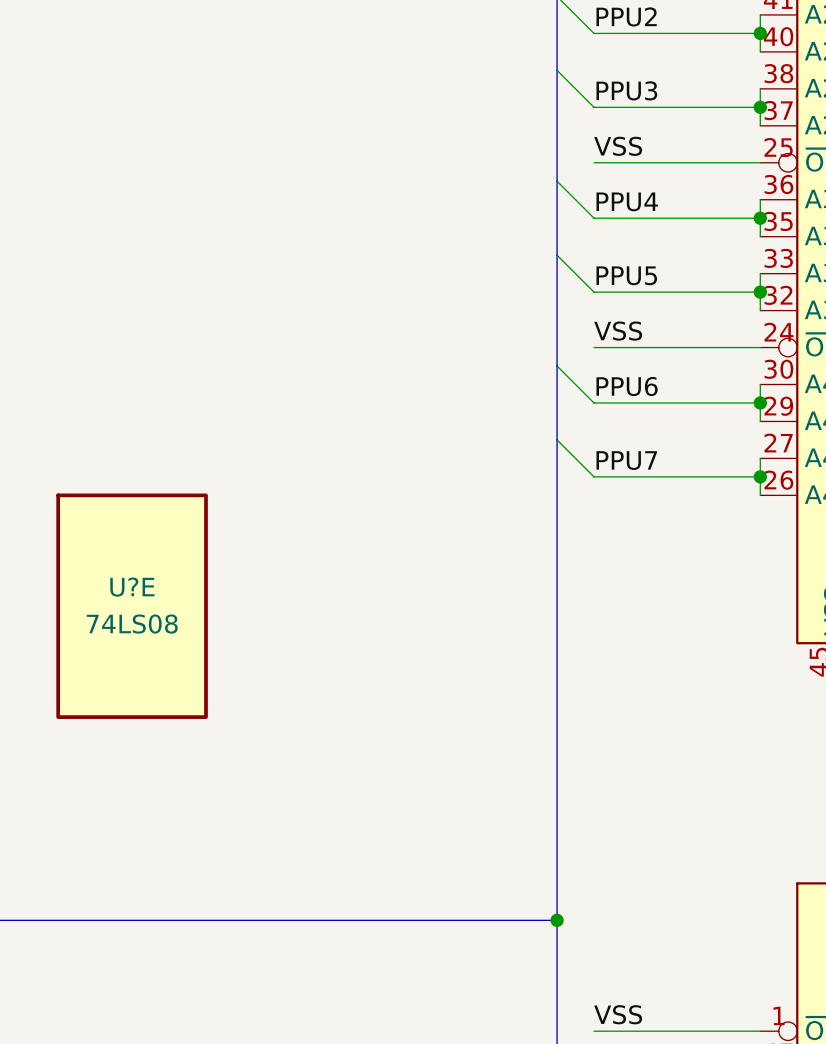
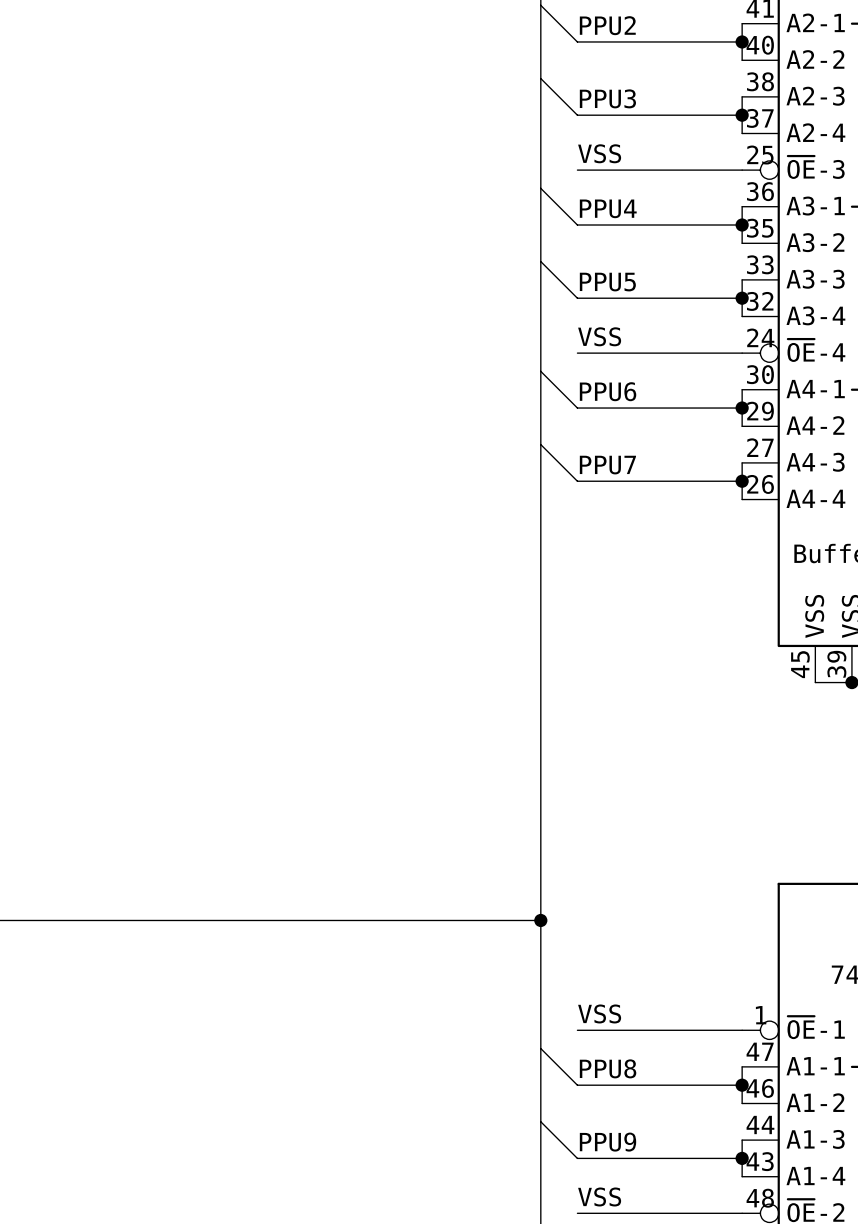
U?E: 74LS08 (132, 606) -> none

